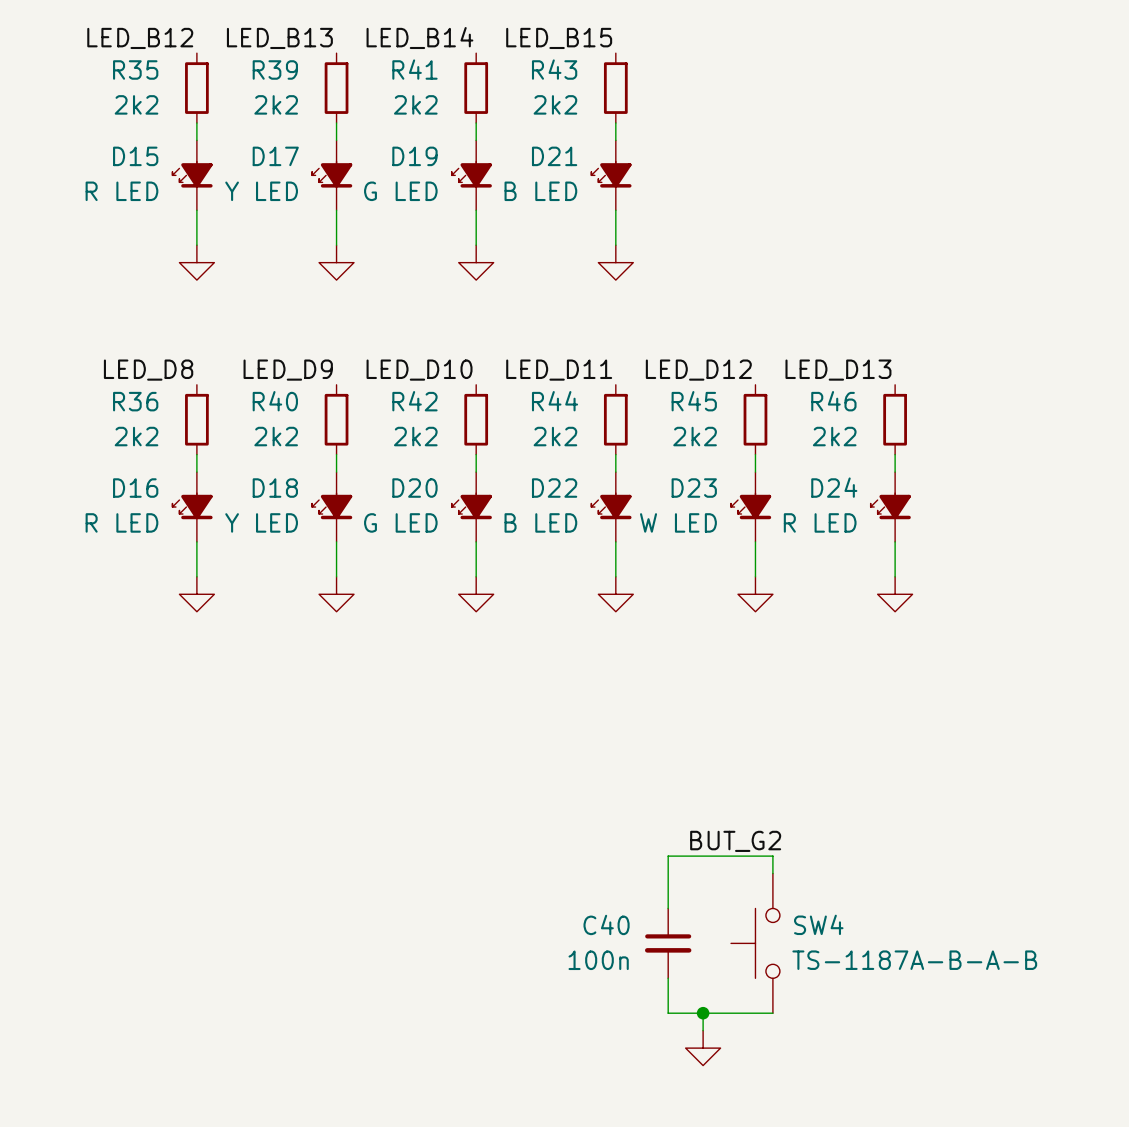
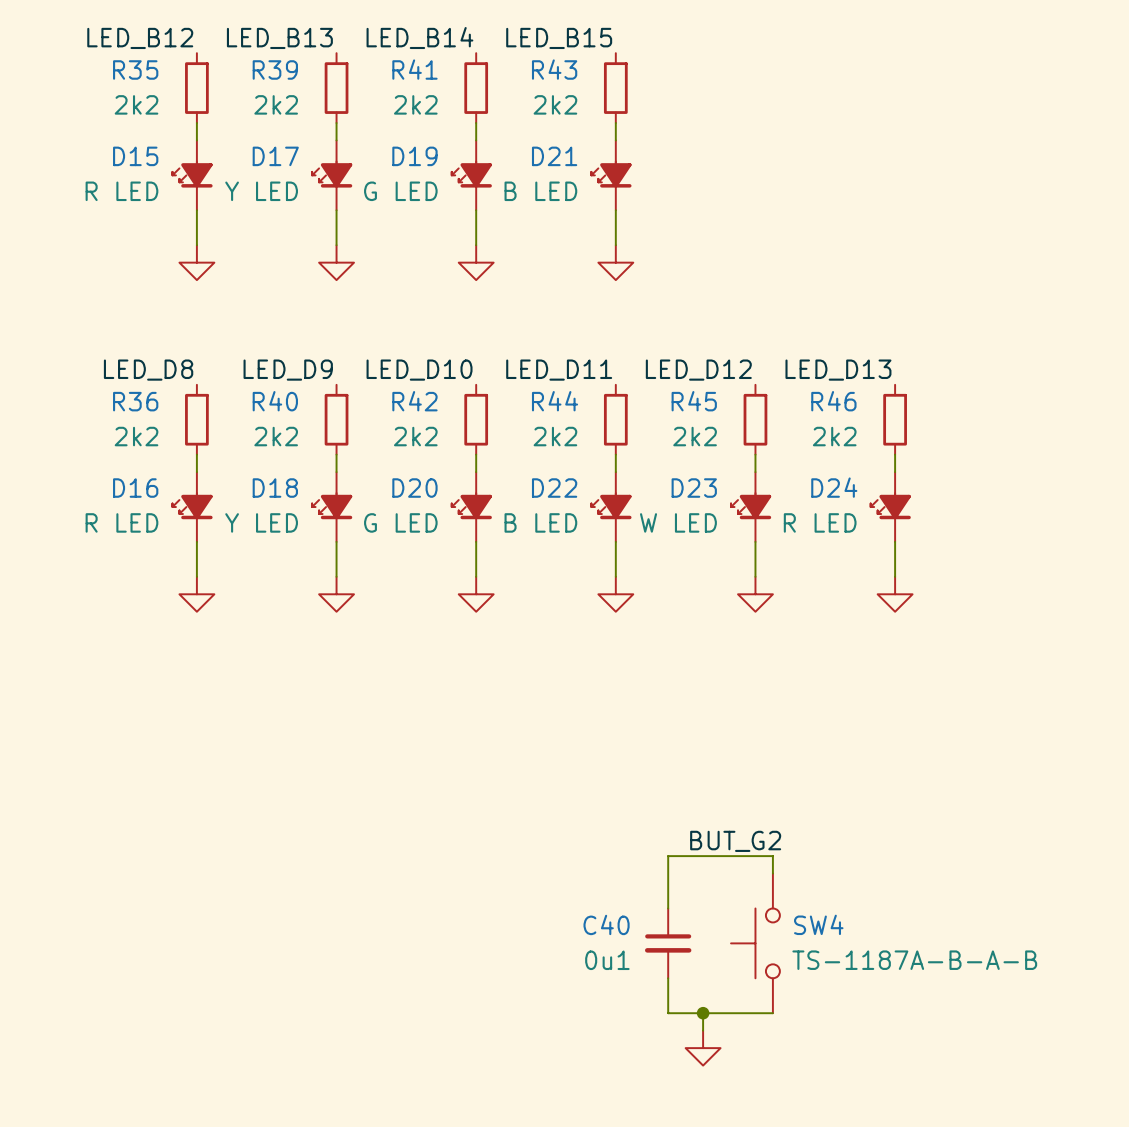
C40 value: 100n (598, 960) -> 0u1 (607, 960)

